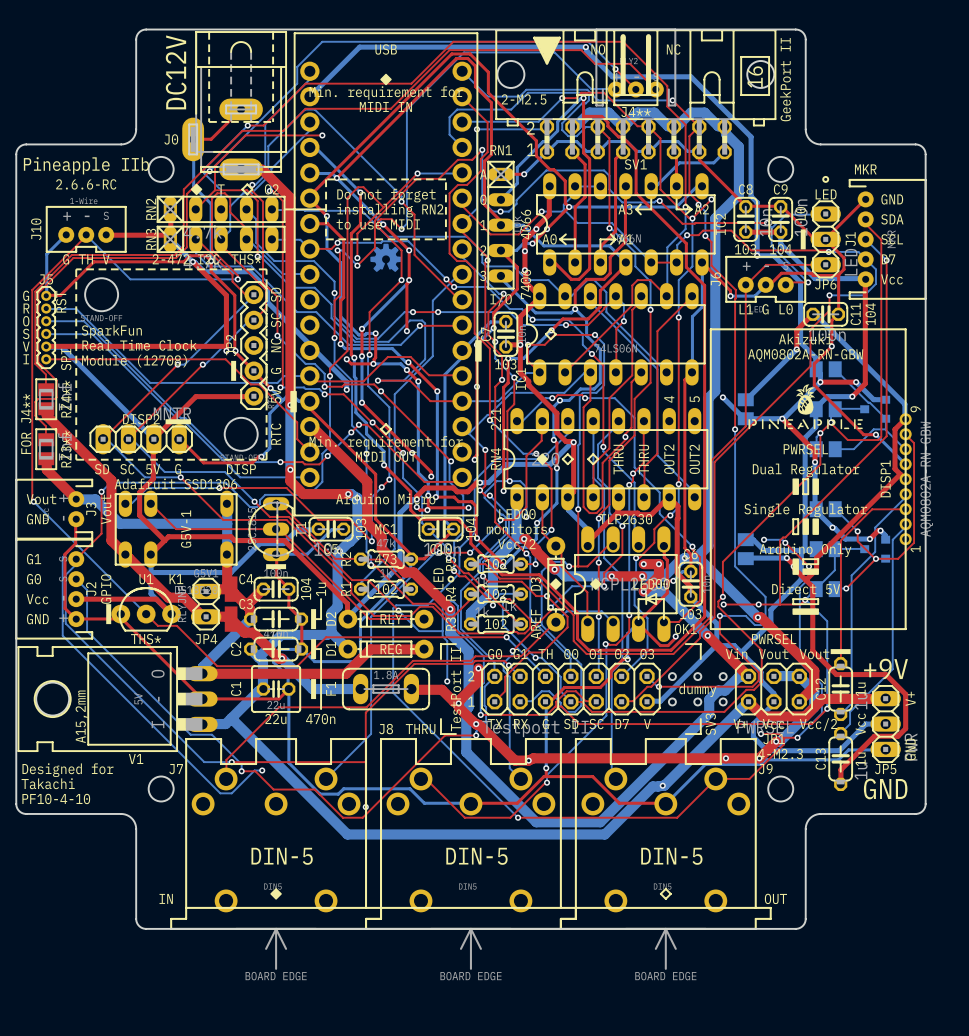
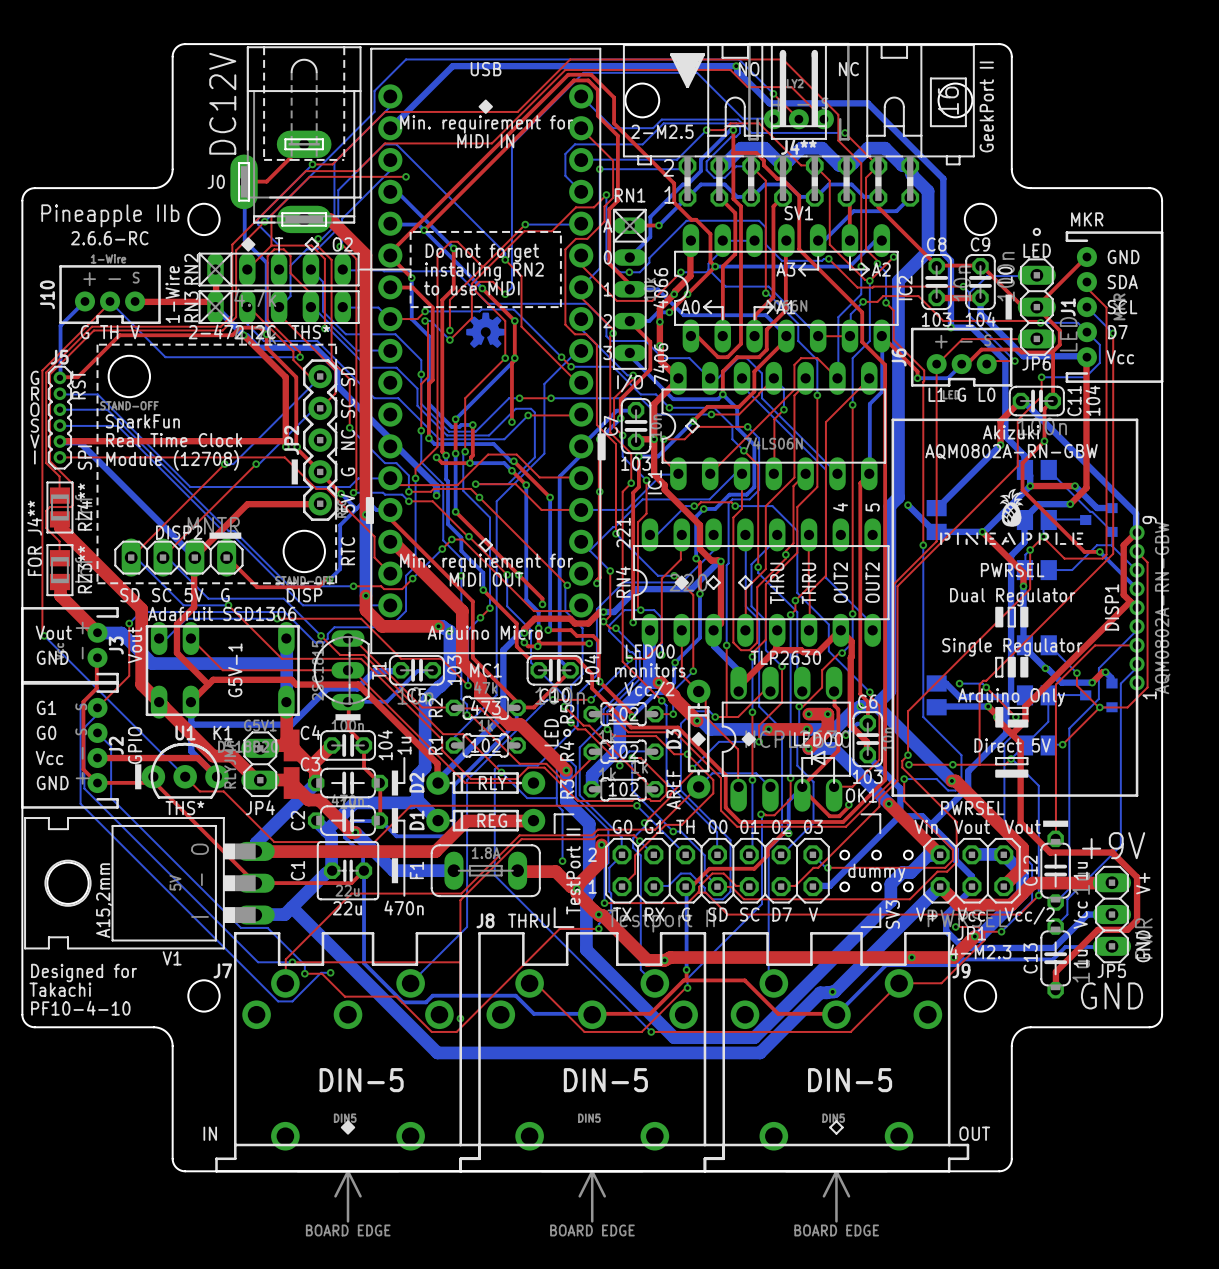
text: none -> 1-Wire (172, 294)

